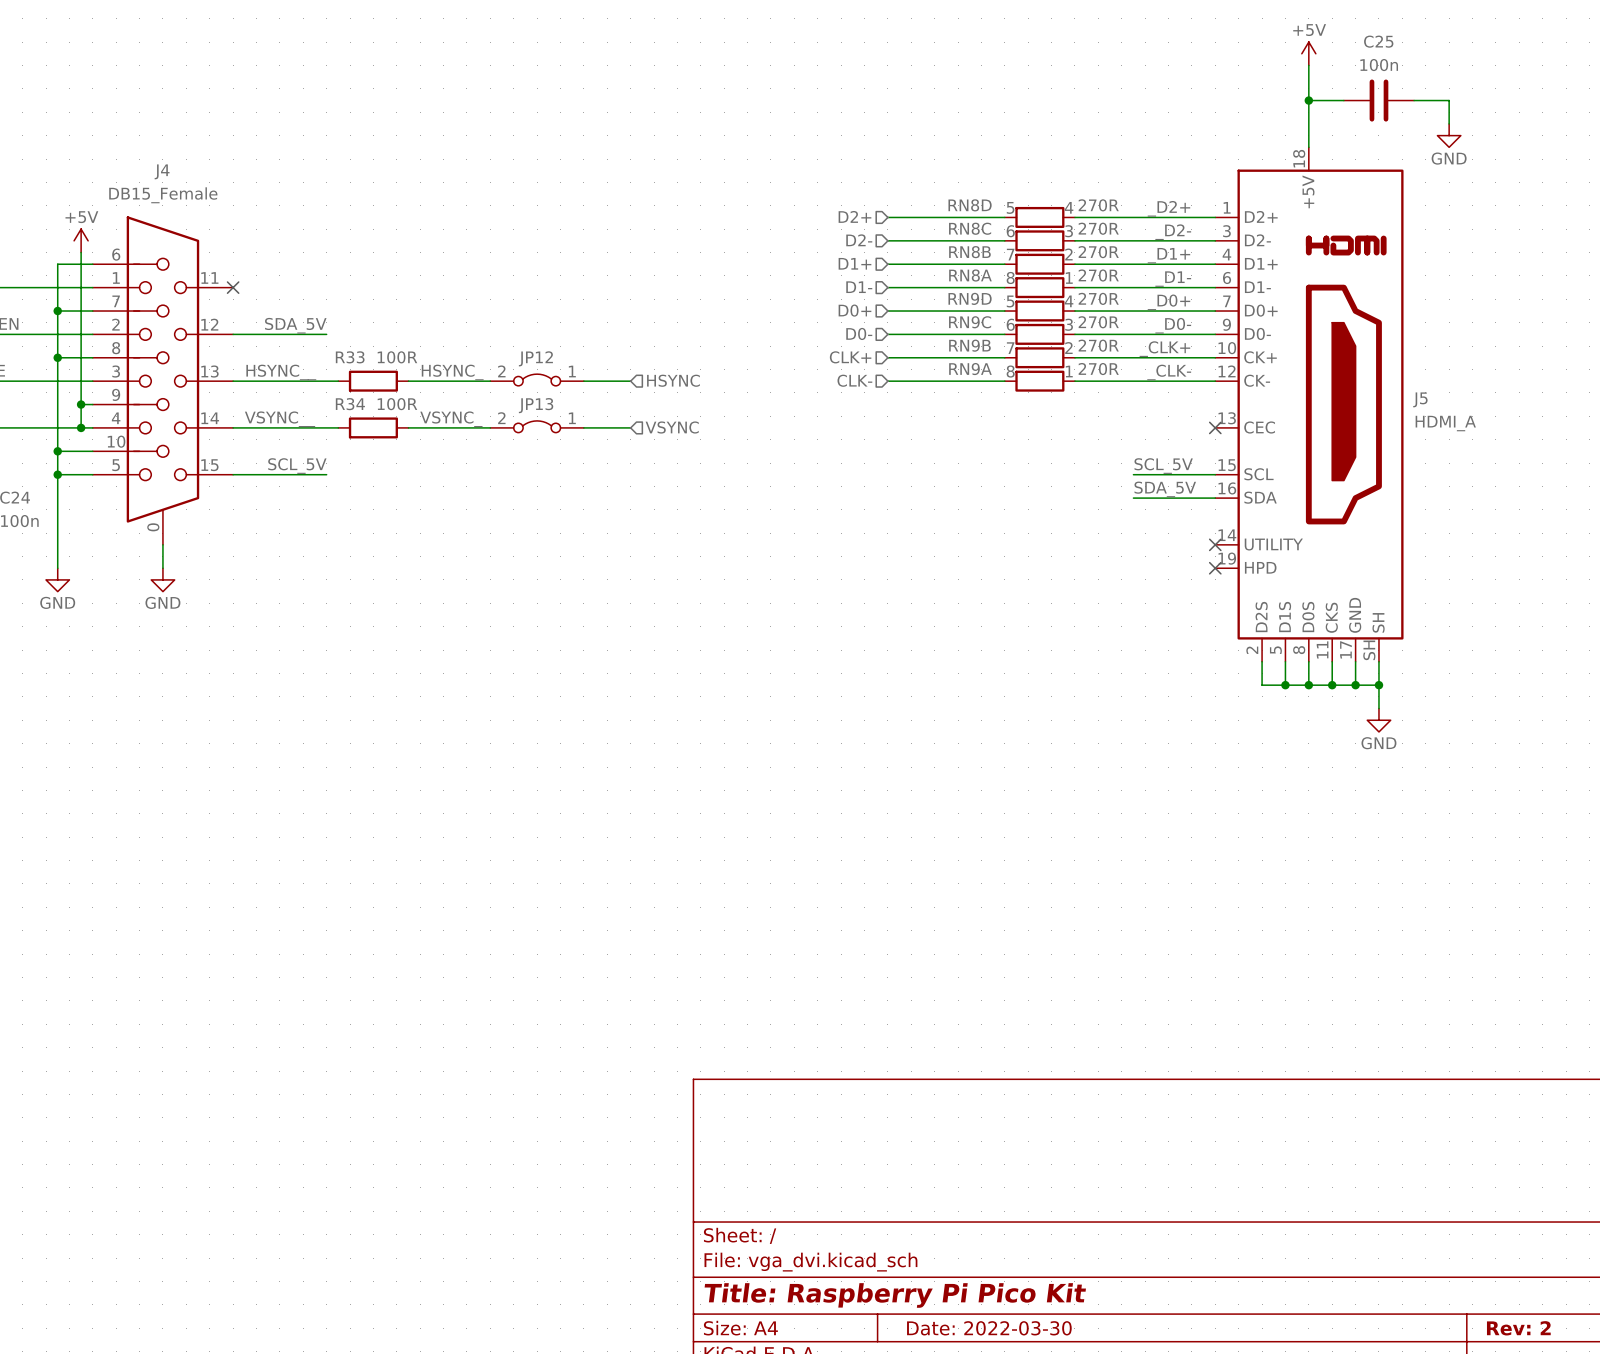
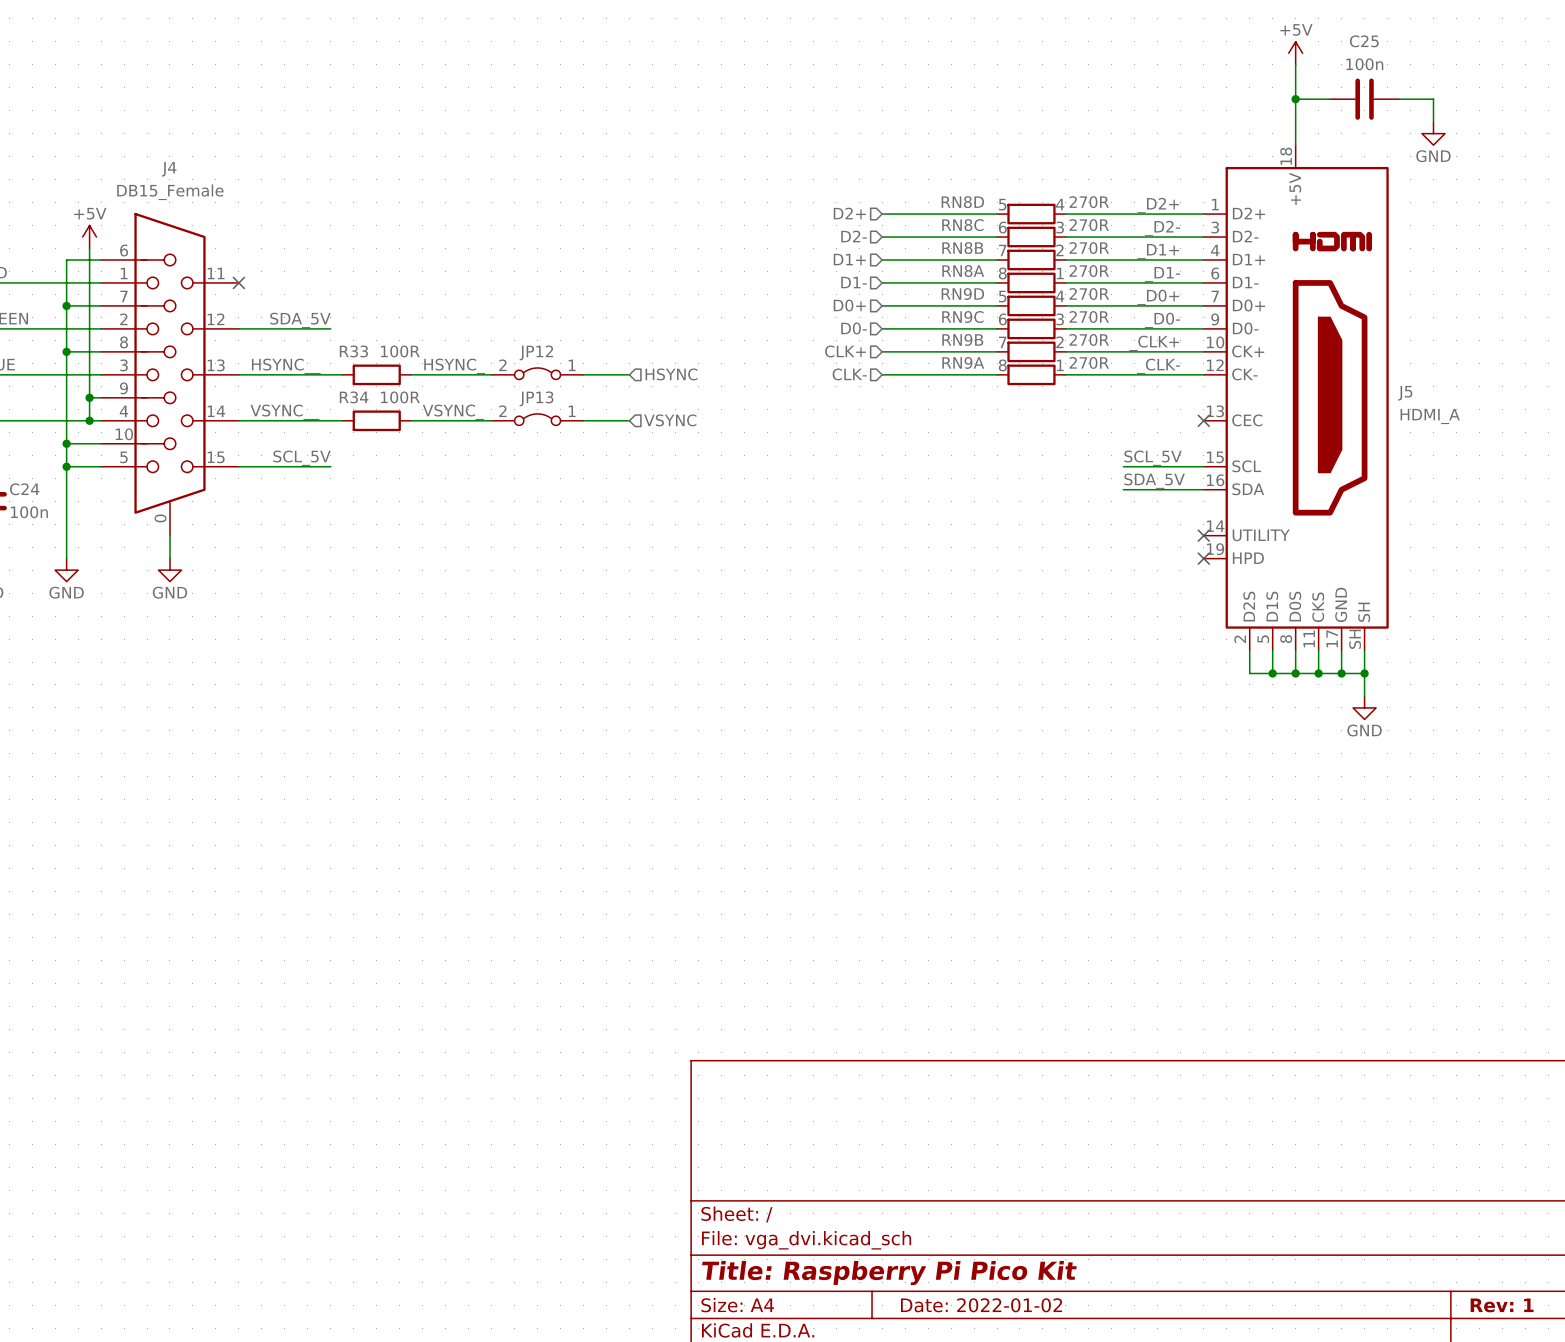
title block: Date: 2022-03-30 (989, 1328) -> Date: 2022-01-02 (981, 1305)
title block: Rev: 2 (1518, 1328) -> Rev: 1 (1502, 1305)

